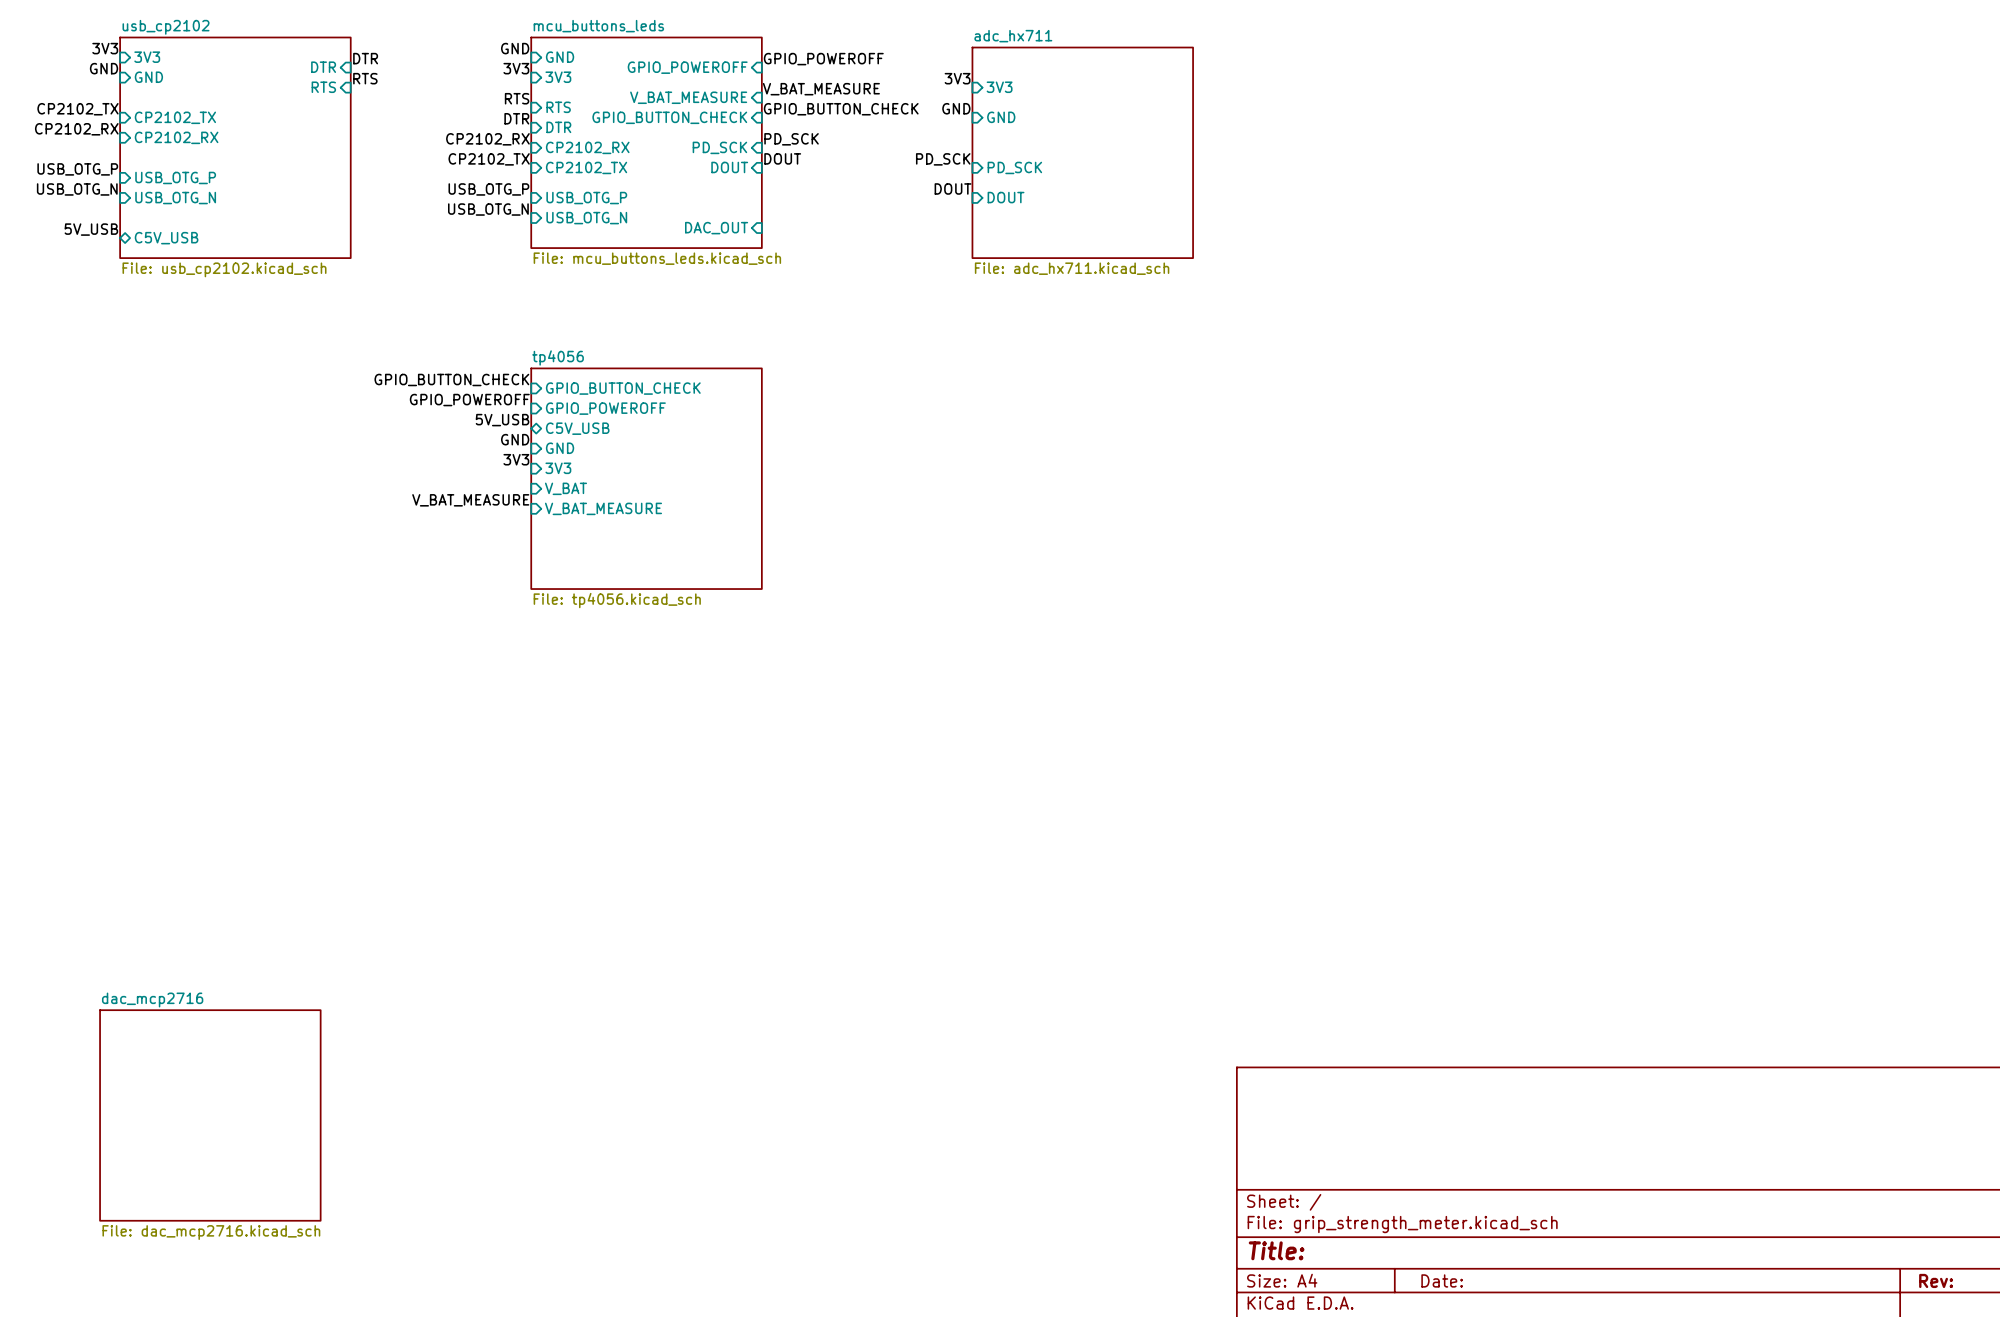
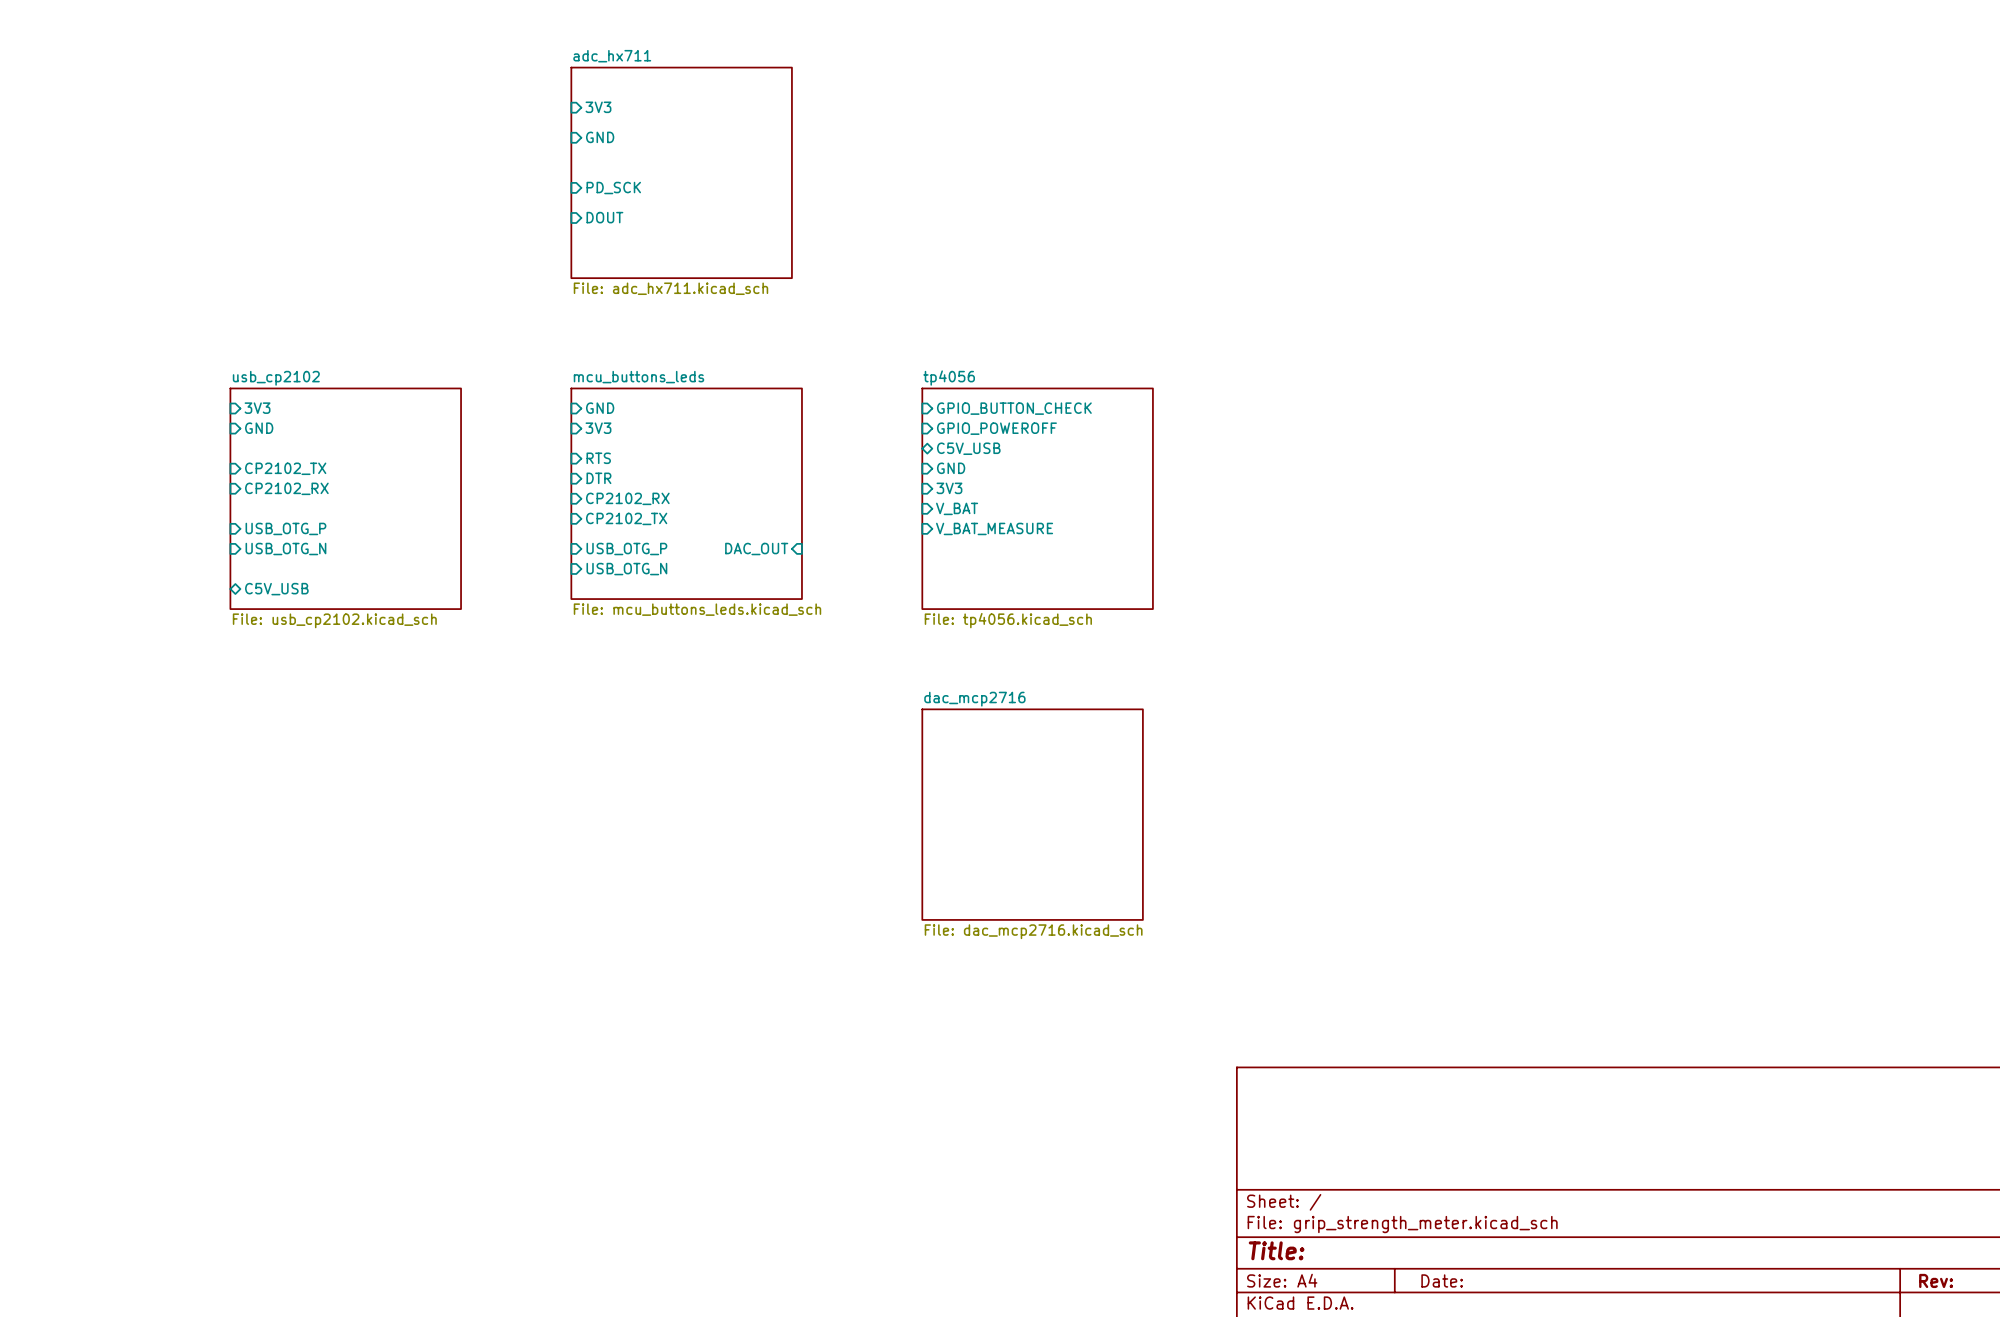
label: 3V3 (105, 48) -> none
label: GND (515, 48) -> none
sheet pin: 3V3 (147, 57) -> none
sheet pin position: GND (560, 57) -> GND (600, 137)
label: DTR (365, 58) -> none
label: GPIO_POWEROFF (823, 59) -> none
sheet pin: DTR (323, 67) -> none
sheet pin: GPIO_POWEROFF (687, 67) -> none
label: GND (104, 68) -> none
label: 3V3 (516, 68) -> none
sheet pin: GND (148, 77) -> none
sheet pin position: 3V3 (558, 77) -> 3V3 (598, 107)
label: RTS (365, 78) -> none
label: 3V3 (957, 78) -> none
sheet pin: RTS (323, 87) -> none
sheet pin: 3V3 (999, 87) -> none
label: V_BAT_MEASURE (821, 89) -> none
sheet pin: V_BAT_MEASURE (688, 97) -> none
label: RTS (517, 98) -> none
sheet pin: RTS (558, 107) -> none
label: GND (956, 108) -> none
label: CP2102_TX (77, 109) -> none
label: GPIO_BUTTON_CHECK (841, 109) -> none
sheet pin: CP2102_TX (175, 117) -> none
sheet pin: GPIO_BUTTON_CHECK (669, 117) -> none
sheet pin: GND (1001, 117) -> none
label: DTR (516, 118) -> none
sheet pin: DTR (558, 127) -> none
label: CP2102_RX (76, 129) -> none
sheet pin: CP2102_RX (176, 137) -> none
label: CP2102_RX (487, 139) -> none
label: PD_SCK (791, 139) -> none
sheet mcu_buttons_leds: File: mcu_buttons_leds.kicad_sch (646, 142) -> none
sheet usb_cp2102 position: (235, 147) -> (345, 498)
sheet pin: CP2102_RX (587, 147) -> none
sheet pin rotation: 0° (719, 147) -> 180° (613, 188)
sheet pin position: PD_SCK (719, 147) -> PD_SCK (613, 188)
sheet adc_hx711 position: (1082, 152) -> (681, 172)
label: DOUT (782, 158) -> none
label: CP2102_TX (489, 159) -> none
label: PD_SCK (943, 159) -> none
sheet pin: CP2102_TX (586, 167) -> none
sheet pin rotation: 0° (729, 167) -> 180° (604, 217)
sheet pin position: DOUT (729, 167) -> DOUT (604, 217)
sheet pin: PD_SCK (1014, 167) -> none
label: USB_OTG_P (77, 169) -> none
sheet pin: USB_OTG_P (175, 177) -> none
label: DOUT (953, 188) -> none
label: USB_OTG_N (77, 189) -> none
label: USB_OTG_P (488, 189) -> none
sheet pin: DOUT (1006, 197) -> none
sheet pin: USB_OTG_N (175, 198) -> none
sheet pin: USB_OTG_P (586, 198) -> none
label: USB_OTG_N (488, 209) -> none
sheet pin: USB_OTG_N (586, 218) -> none
sheet pin: DAC_OUT (716, 228) -> none
label: 5V_USB (91, 229) -> none
sheet pin: C5V_USB (166, 238) -> none
label: GPIO_BUTTON_CHECK (451, 379) -> none
sheet pin: GPIO_BUTTON_CHECK (623, 388) -> none
label: GPIO_POWEROFF (469, 400) -> none
sheet pin: none -> 3V3 (257, 408)
sheet pin: GPIO_POWEROFF (605, 408) -> none
sheet pin: none -> GPIO_BUTTON_CHECK (1014, 408)
label: 5V_USB (502, 420) -> none
sheet pin: none -> GND (259, 428)
sheet pin: C5V_USB (577, 428) -> none
sheet pin: none -> GPIO_POWEROFF (996, 428)
label: GND (515, 439) -> none
sheet pin position: GND (560, 448) -> GND (600, 408)
sheet pin: none -> C5V_USB (968, 448)
sheet pin: none -> RTS (598, 458)
label: 3V3 (516, 459) -> none
sheet pin: none -> CP2102_TX (285, 468)
sheet pin position: 3V3 (558, 468) -> 3V3 (598, 428)
sheet pin: none -> GND (951, 468)
sheet pin: none -> DTR (598, 478)
sheet tp4056 position: (646, 478) -> (1037, 498)
sheet pin: none -> CP2102_RX (286, 488)
sheet pin: V_BAT (566, 488) -> none
sheet pin: none -> 3V3 (949, 488)
sheet mcu_buttons_leds: none -> File: mcu_buttons_leds.kicad_sch (686, 493)
sheet pin: none -> CP2102_RX (627, 498)
label: V_BAT_MEASURE (470, 500) -> none
sheet pin: V_BAT_MEASURE (603, 508) -> none
sheet pin: none -> V_BAT (957, 508)
sheet pin: none -> CP2102_TX (626, 518)
sheet pin: none -> USB_OTG_P (285, 528)
sheet pin: none -> V_BAT_MEASURE (994, 528)
sheet pin: none -> USB_OTG_N (285, 549)
sheet pin: none -> USB_OTG_P (626, 549)
sheet pin: none -> DAC_OUT (756, 549)
sheet pin: none -> USB_OTG_N (626, 569)
sheet pin: none -> C5V_USB (276, 589)
sheet dac_mcp2716 position: (210, 1115) -> (1032, 814)

